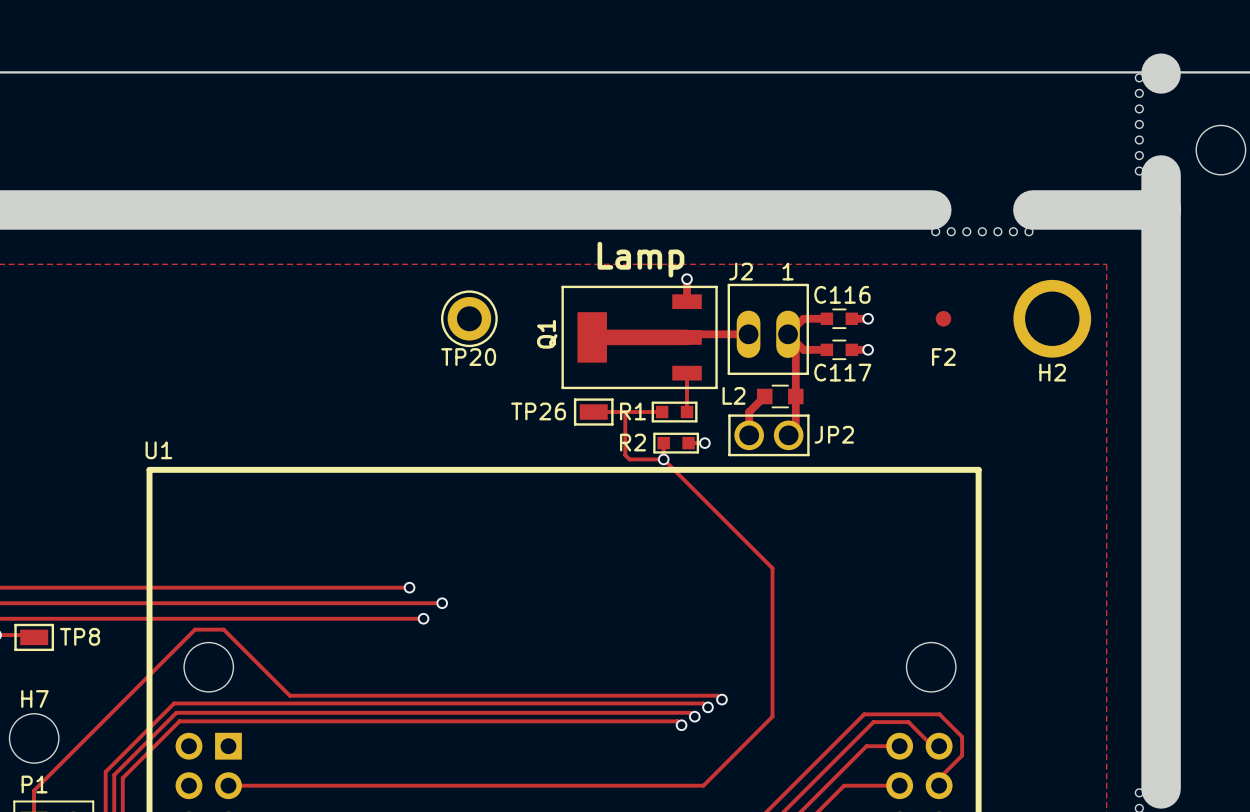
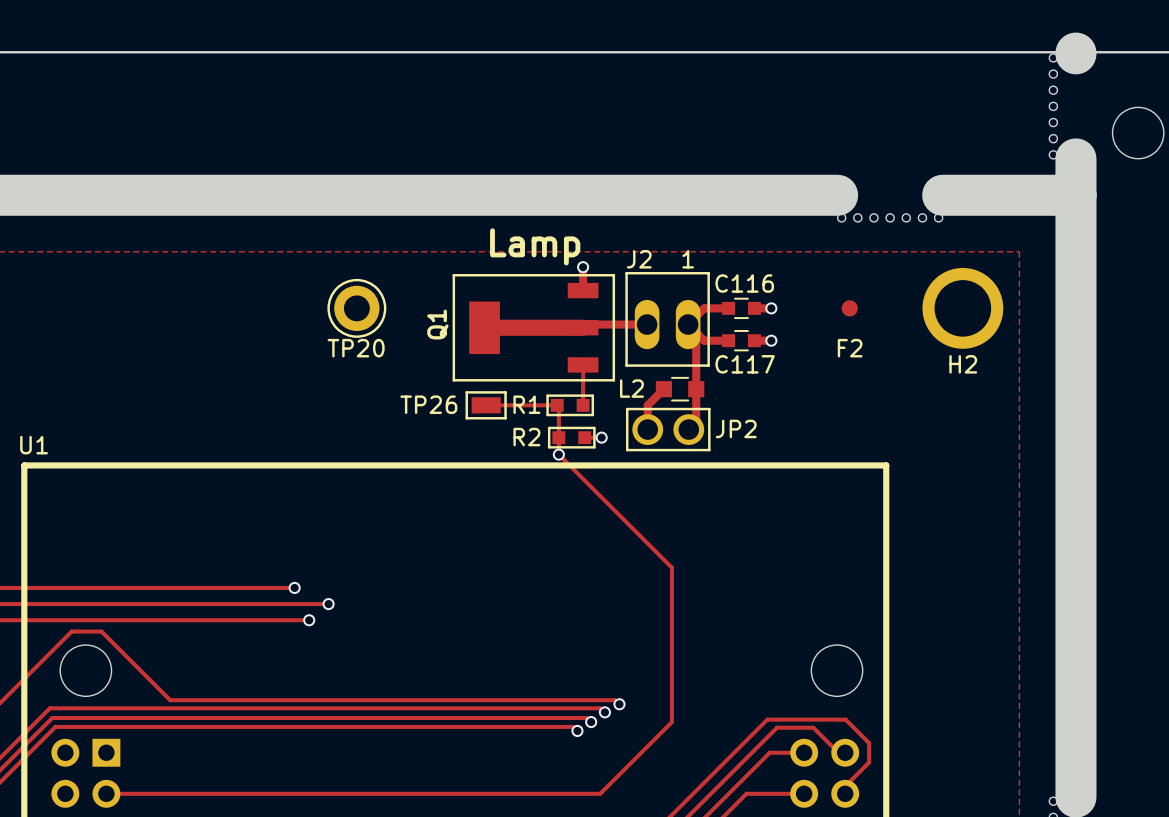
track: (625, 412) (625, 455) (629, 459) (663, 459) -> none
track: none -> (558, 406) (558, 437)

